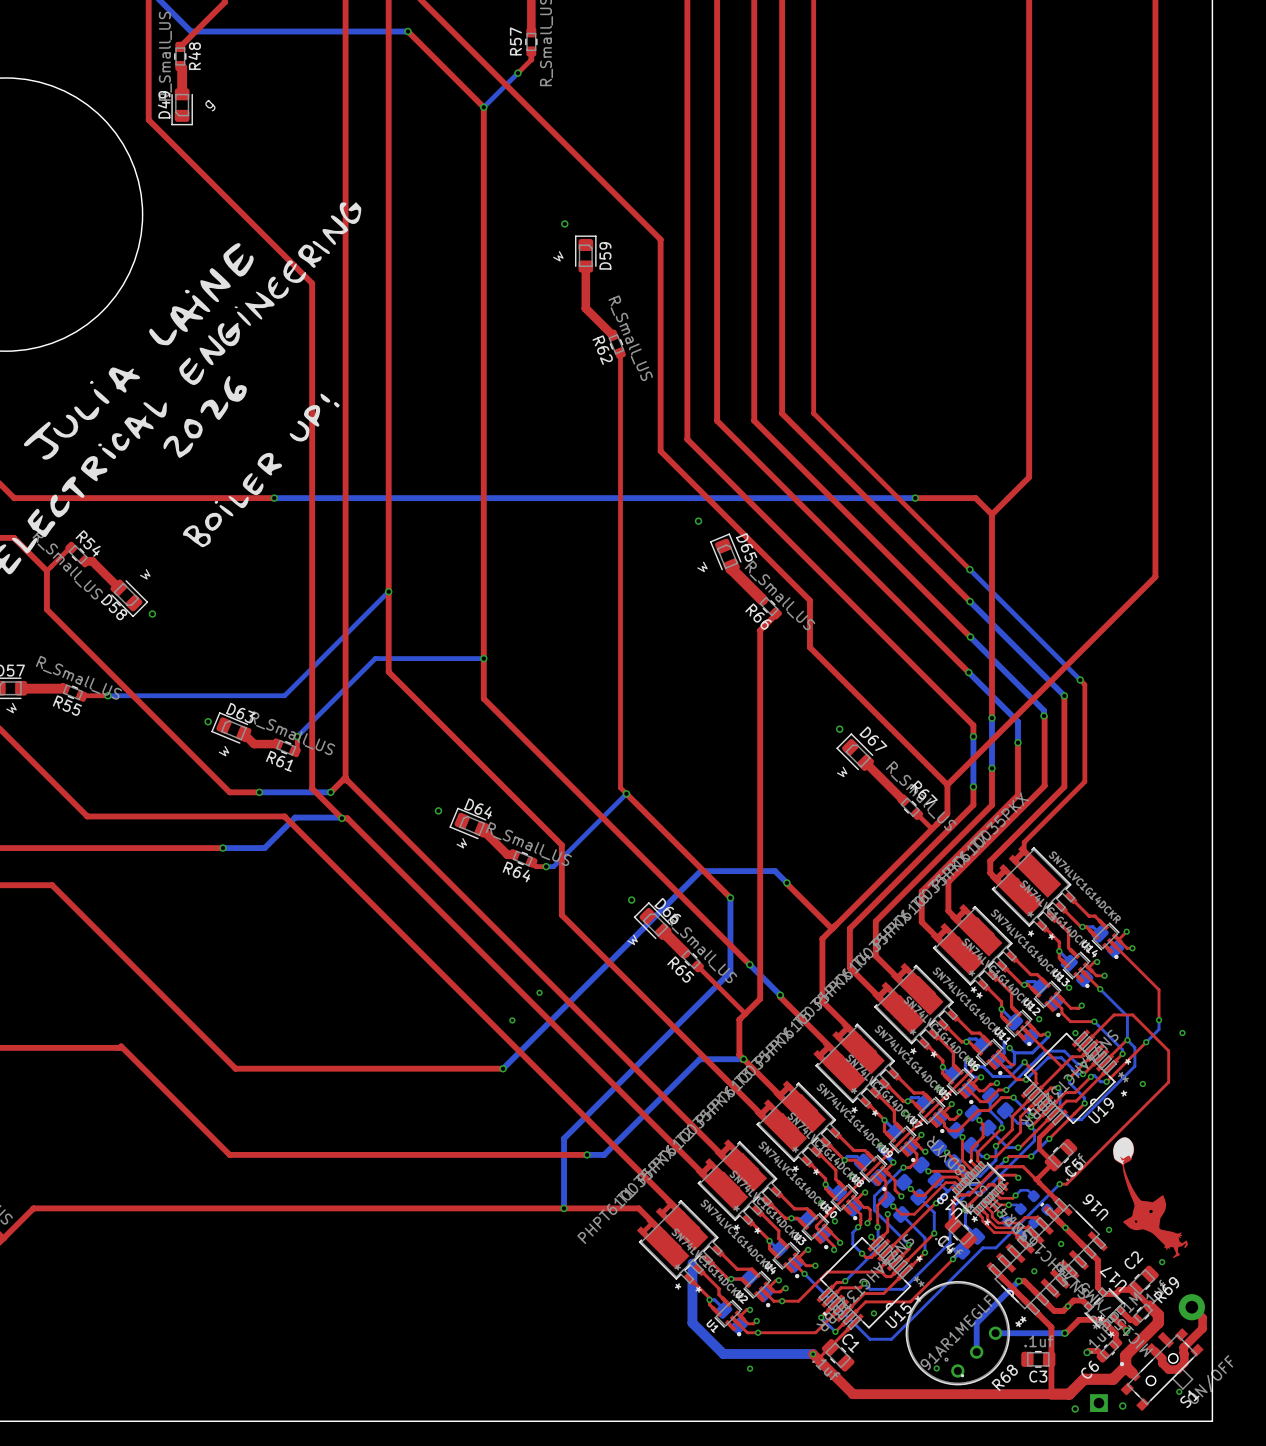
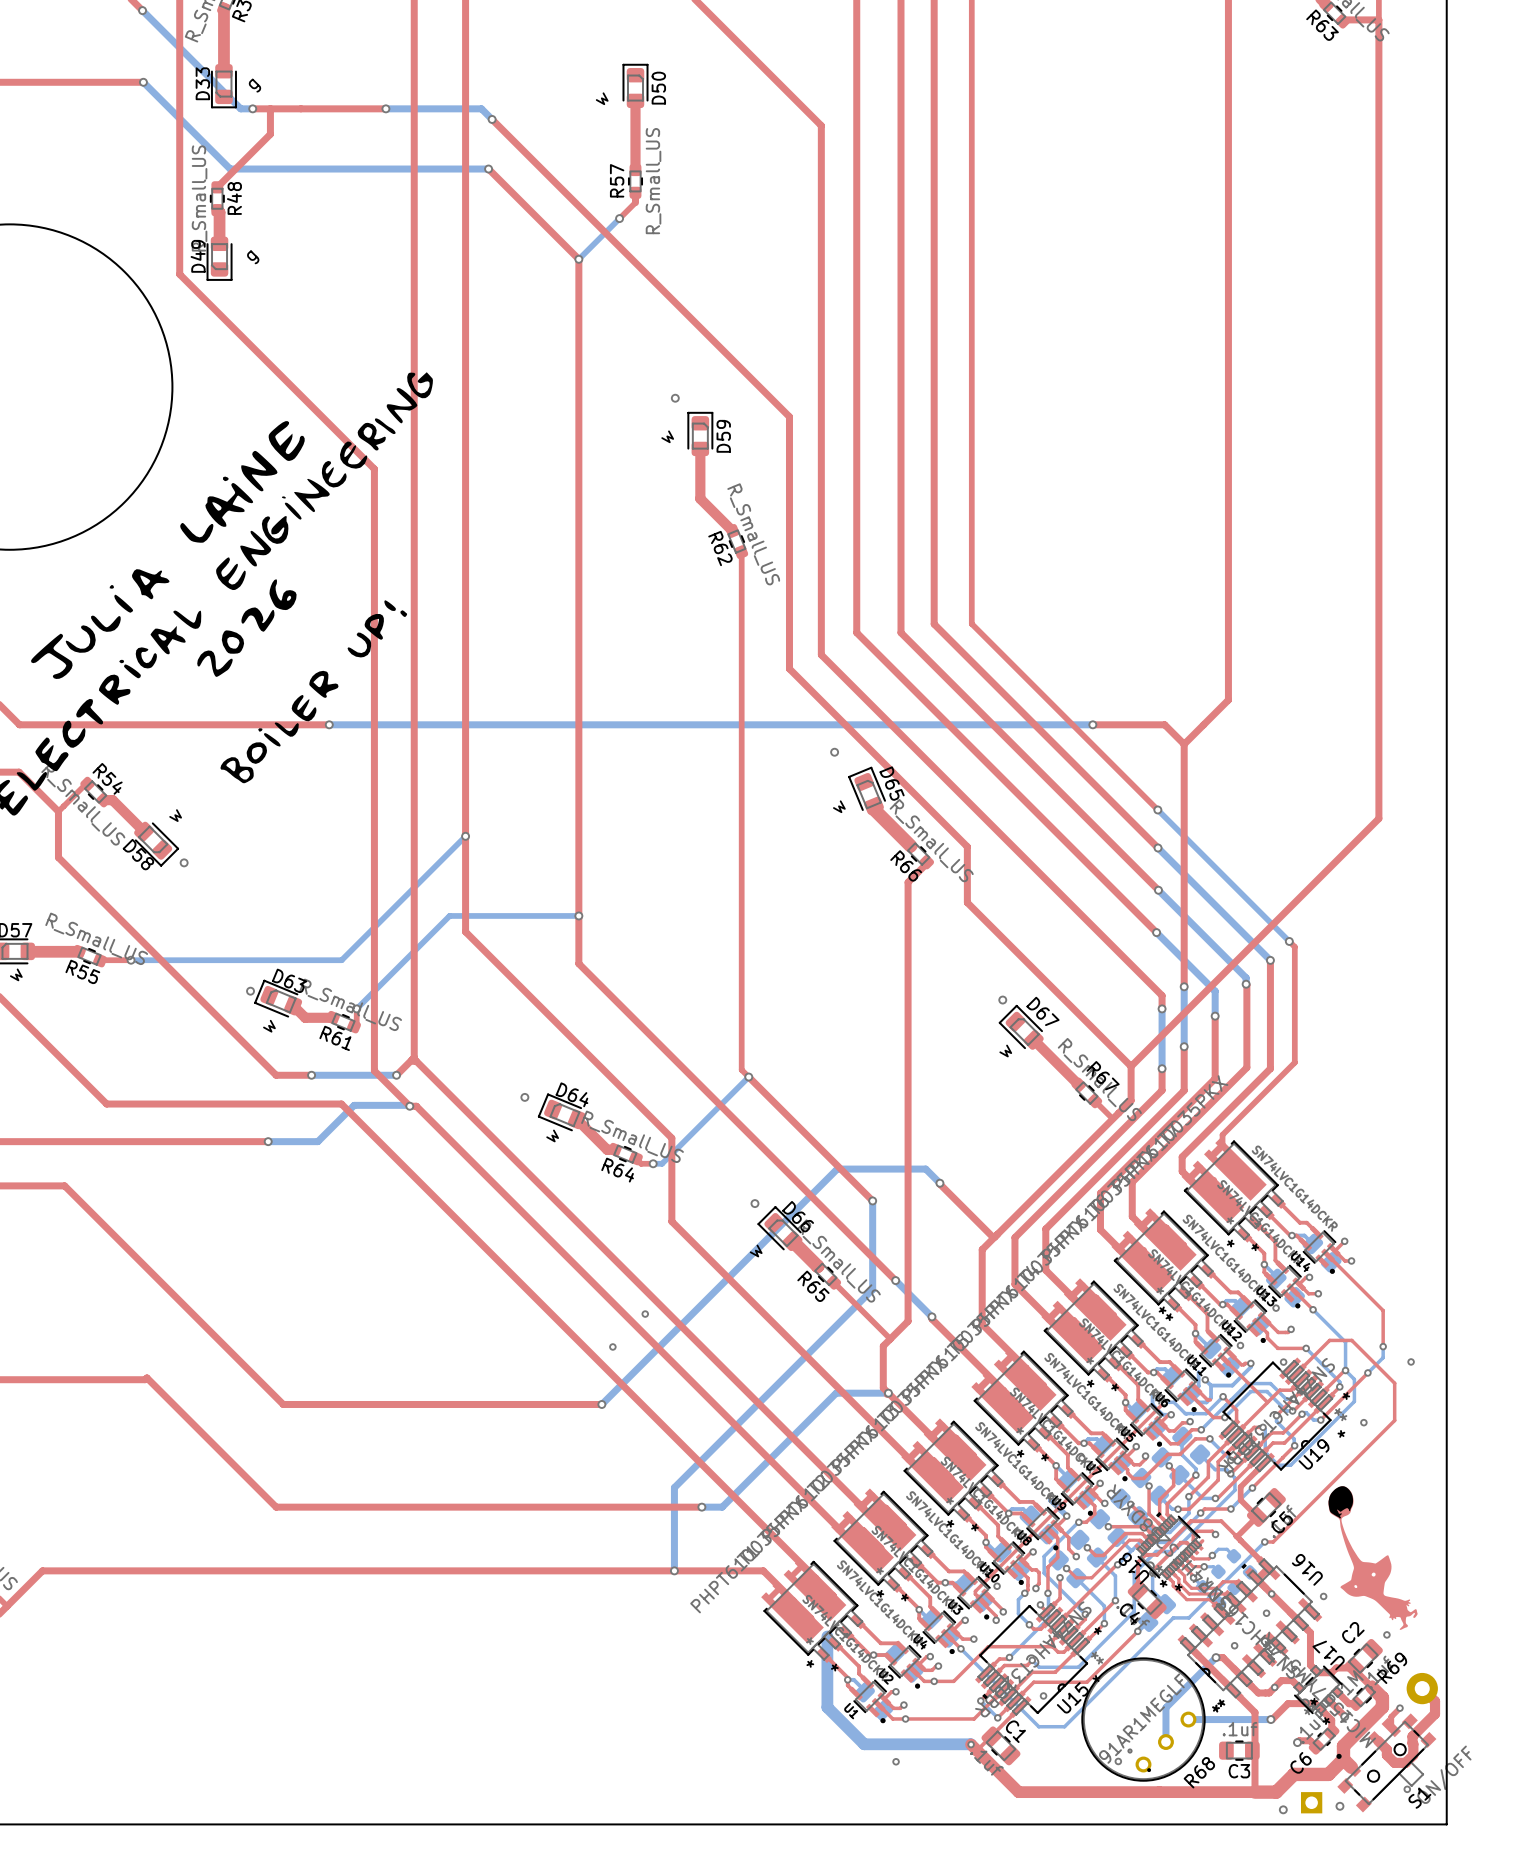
top track: none -> (1399, 1708) (1391, 1716) (1391, 1727)
via: none -> (1399, 1708)

